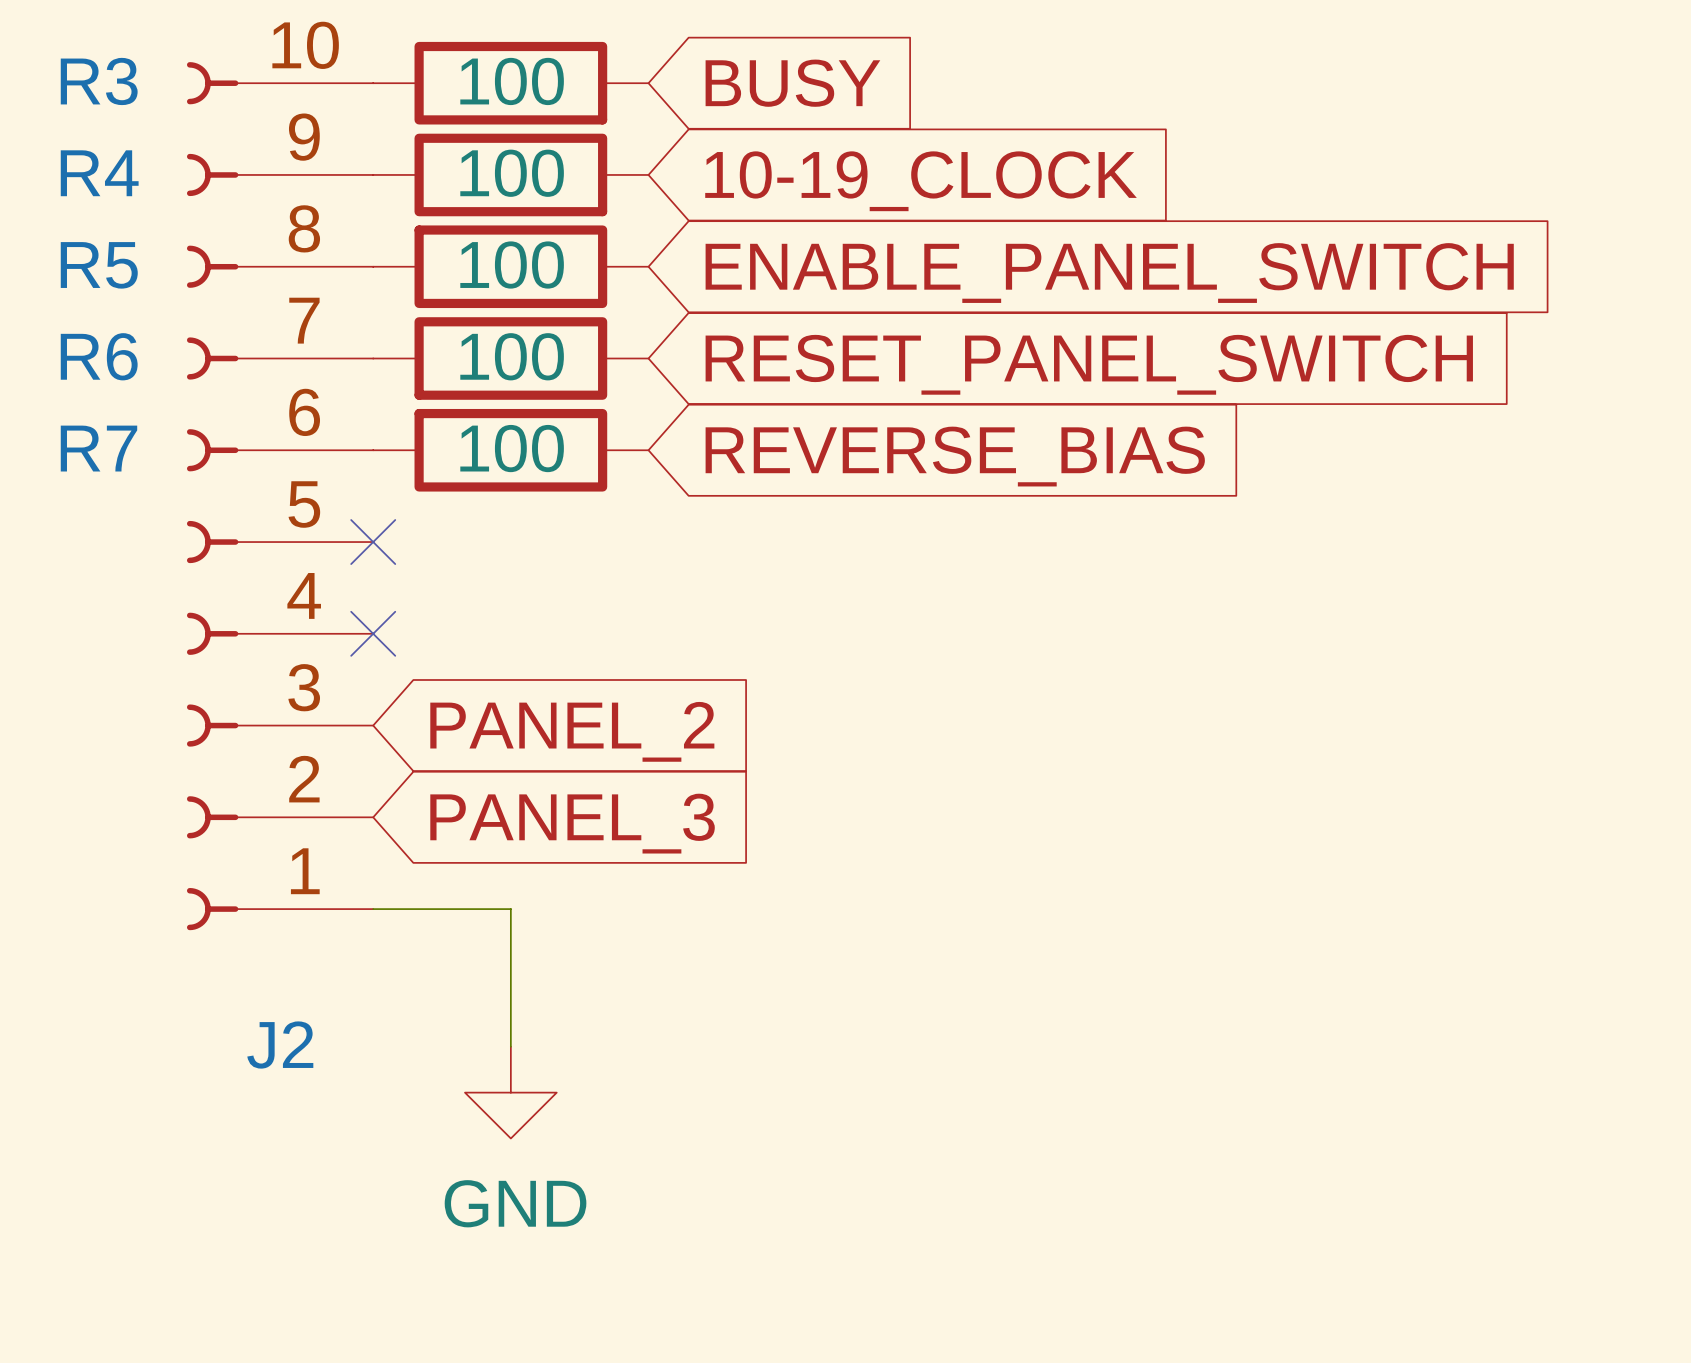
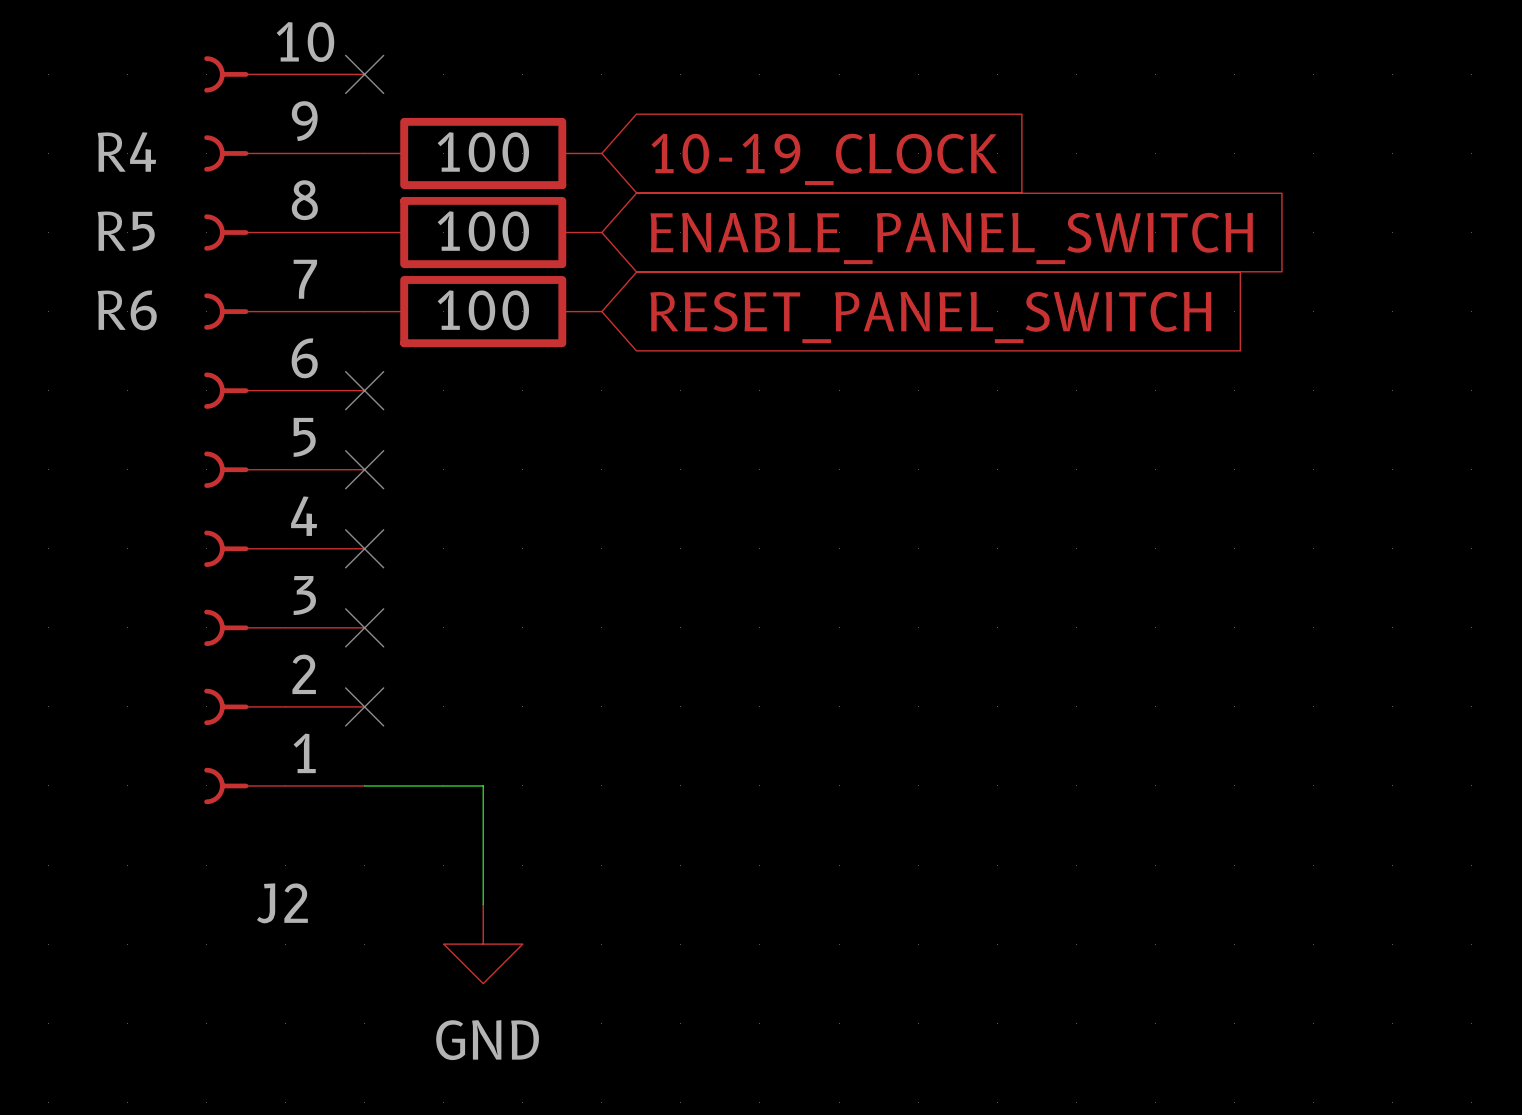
no-connect mark: none -> (364, 74)
R3: 100 (510, 83) -> none
global label: BUSY (792, 83) -> none
no-connect mark: none -> (364, 390)
R7: 100 (510, 450) -> none
global label: REVERSE_BIAS (955, 456) -> none
no-connect mark: none -> (364, 627)
global label: PANEL_2 (572, 731) -> none
no-connect mark: none -> (364, 706)
global label: PANEL_3 (572, 823) -> none

